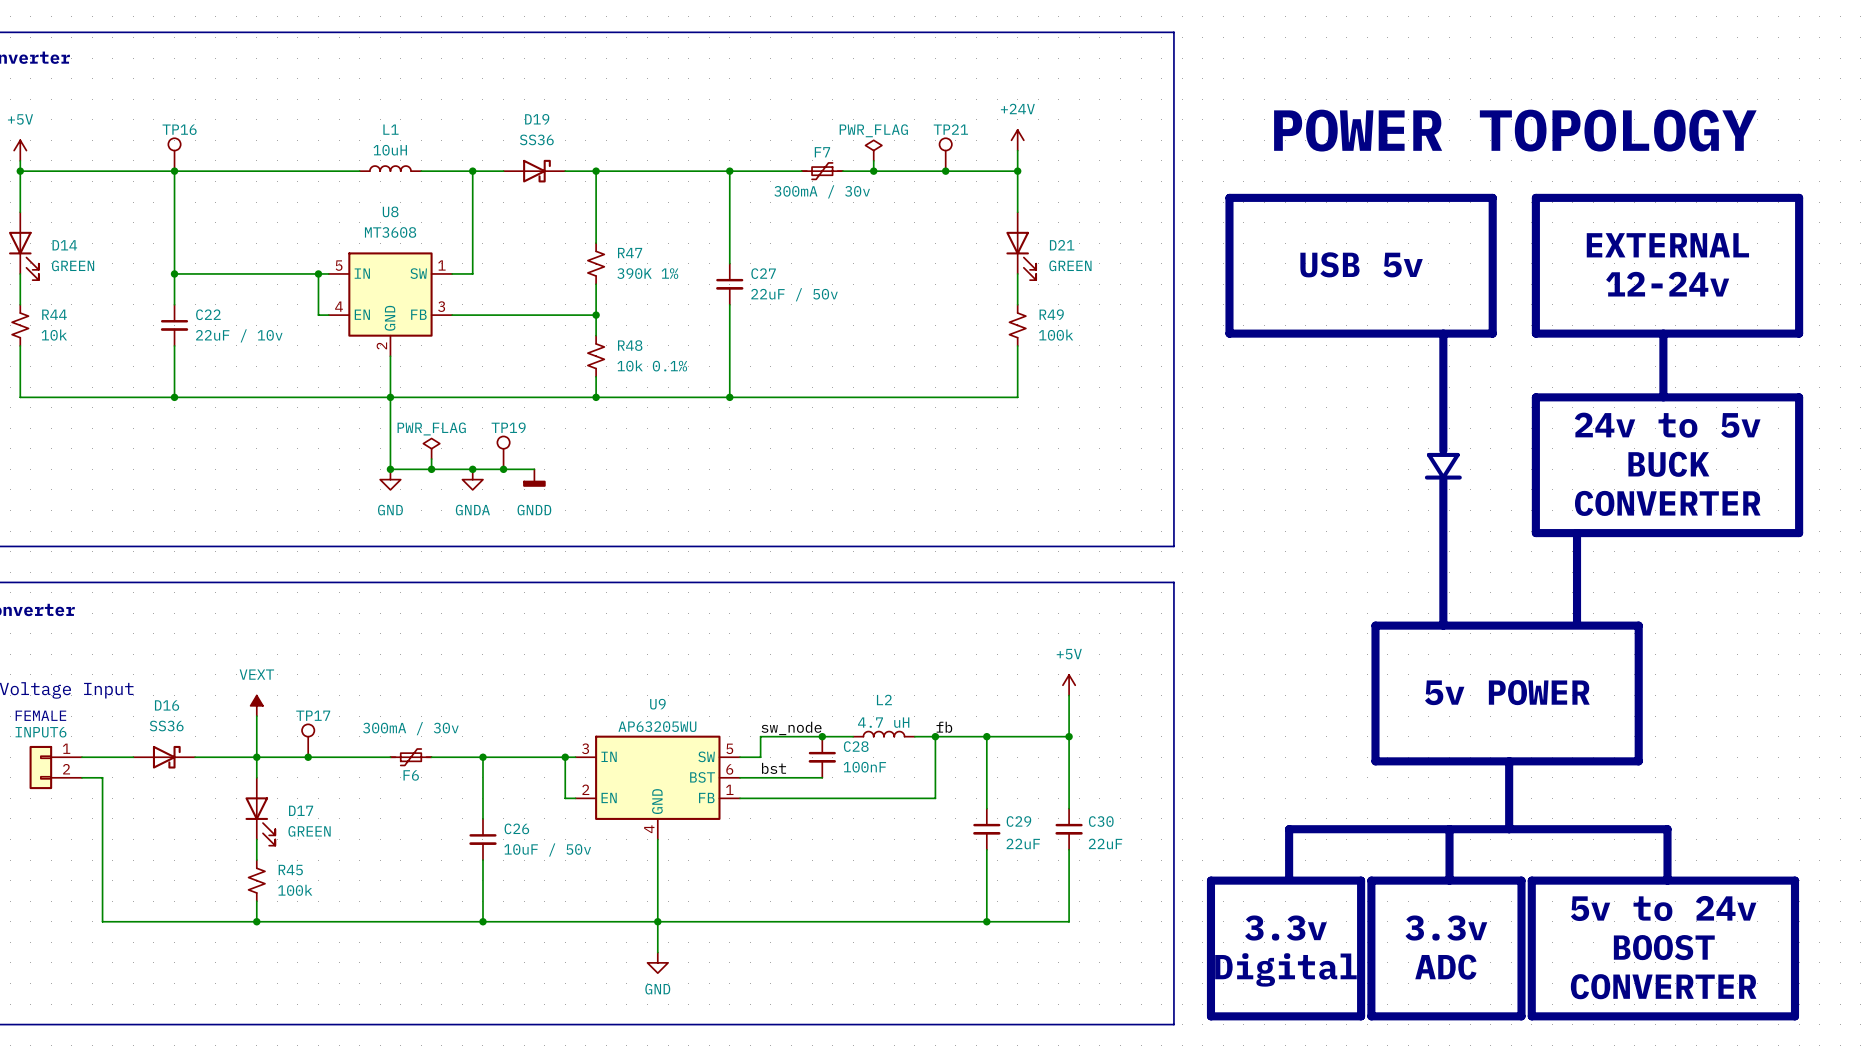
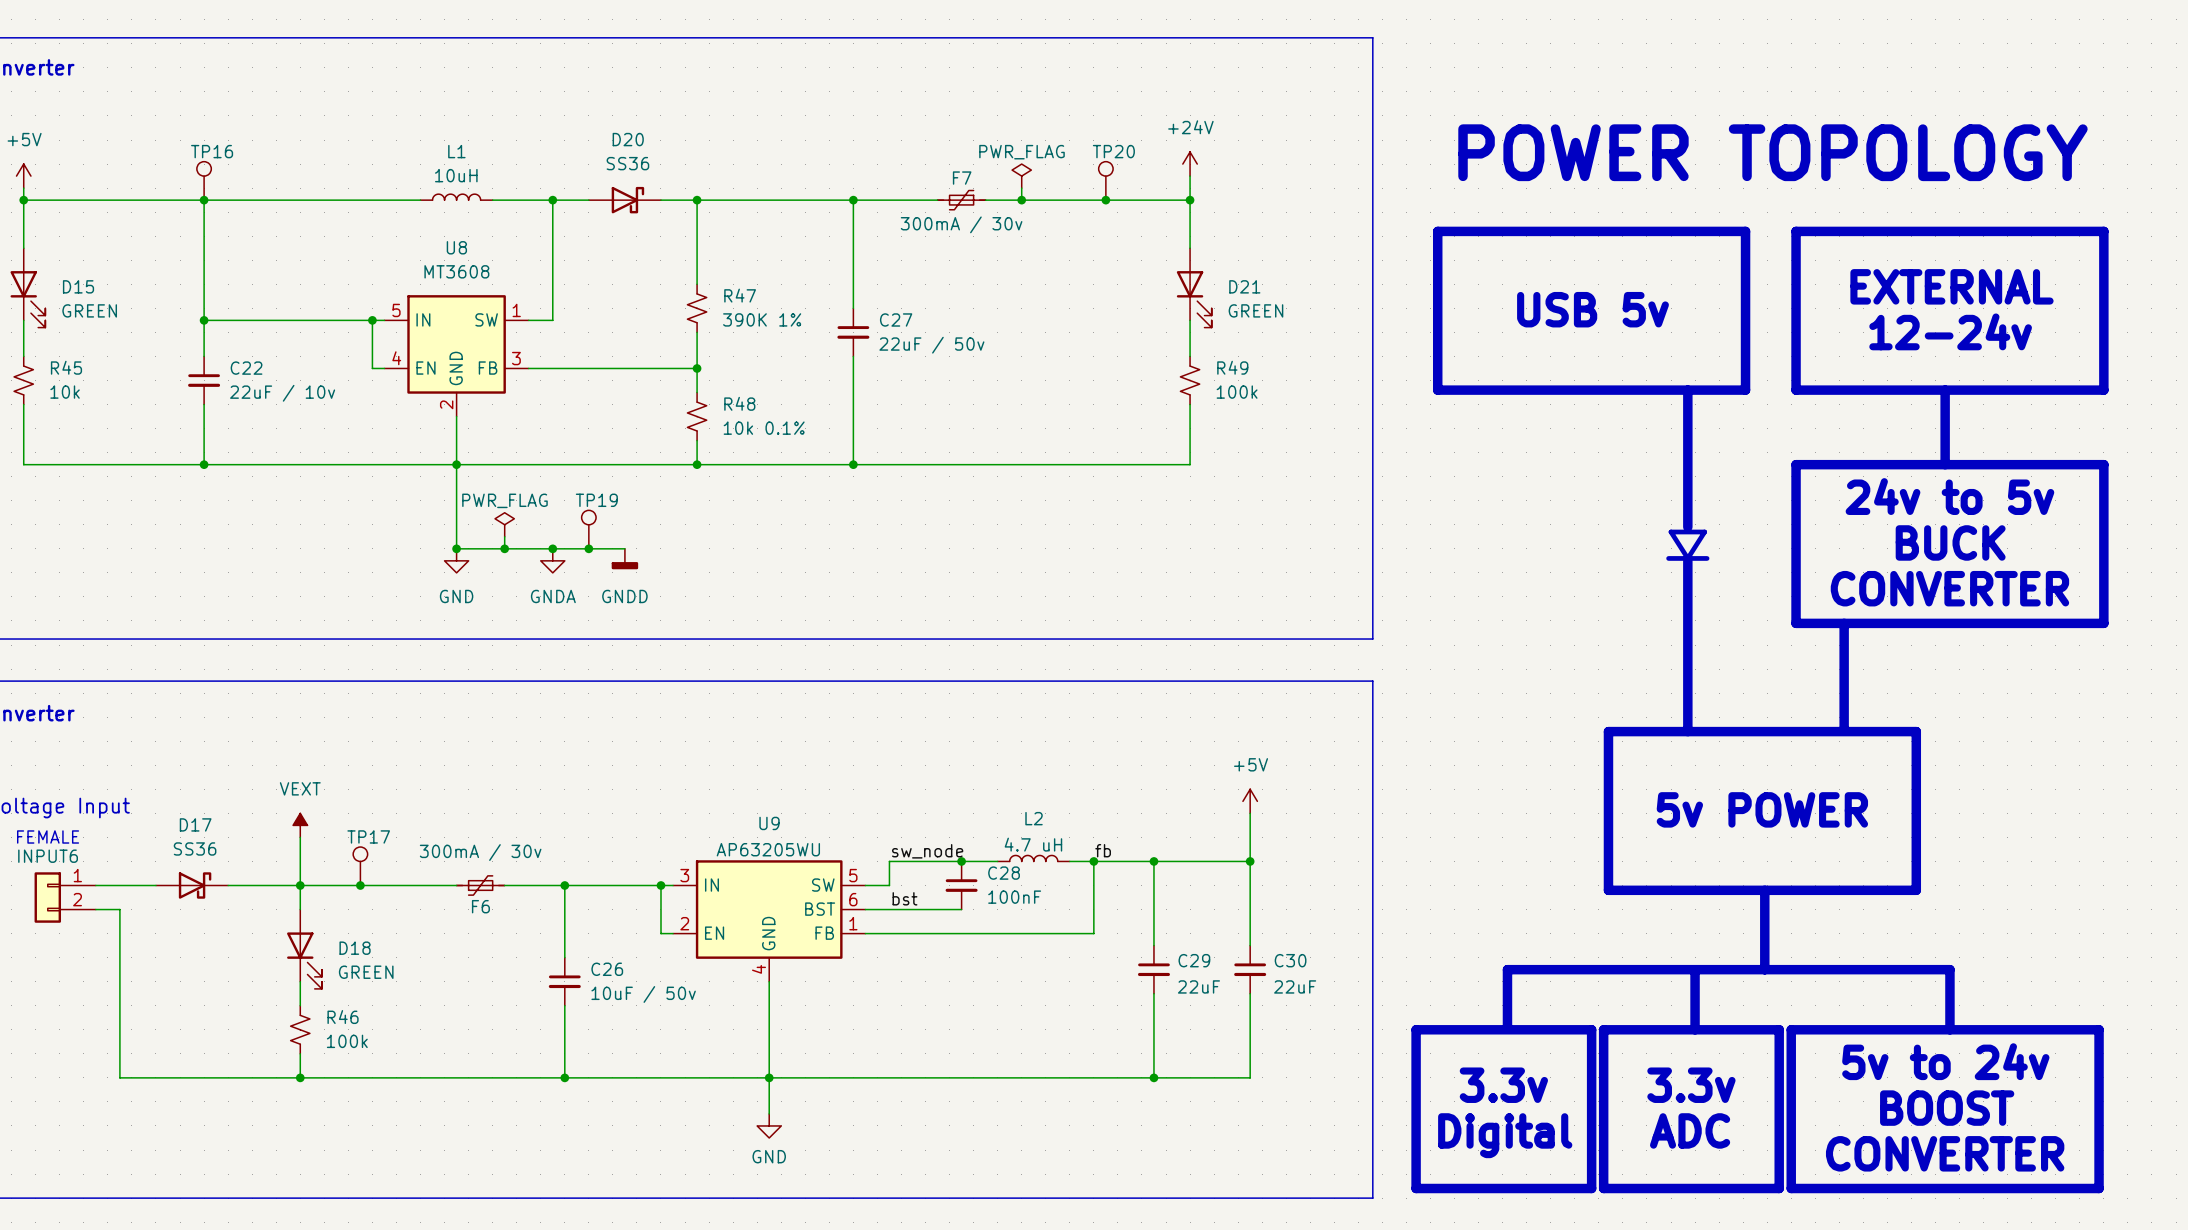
D19 name: D19 (537, 119) -> D20 (628, 139)
TP21 name: TP21 (950, 129) -> TP20 (1113, 151)
D14 name: D14 (64, 245) -> D15 (78, 286)
R44 name: R44 (54, 314) -> R45 (66, 367)
D16 name: D16 (167, 705) -> D17 (195, 824)
D17 name: D17 (301, 810) -> D18 (355, 948)
R45 name: R45 (290, 870) -> R46 (343, 1017)

